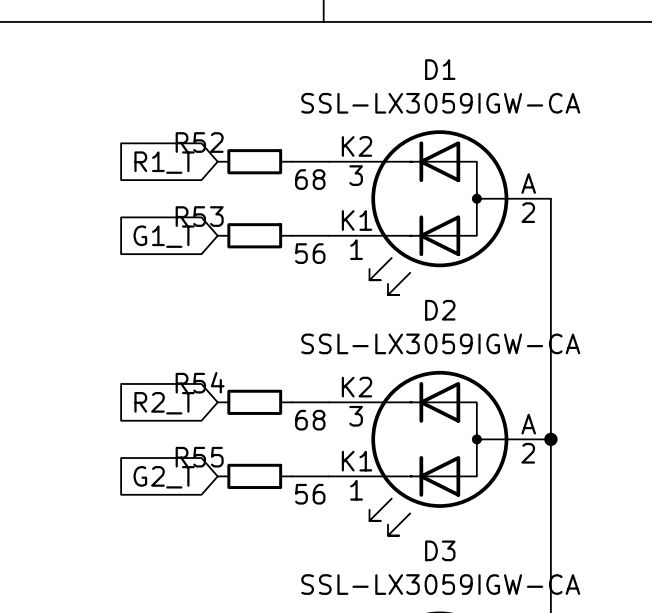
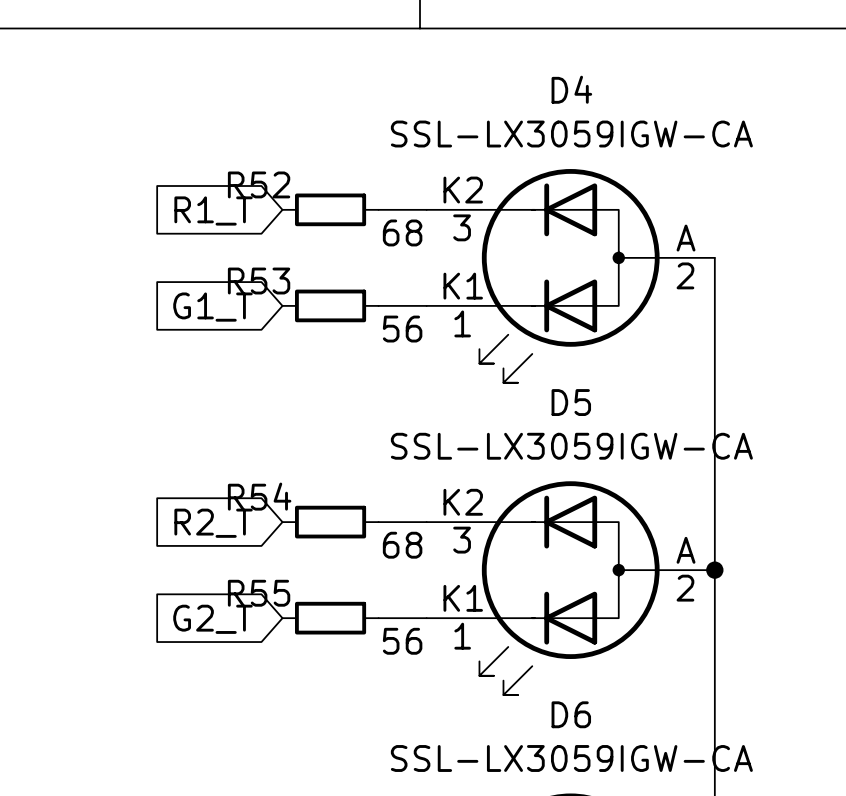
D1 name: D1 (440, 69) -> D4 (571, 89)
D2 name: D2 (440, 310) -> D5 (571, 402)
D3 name: D3 (440, 550) -> D6 (571, 714)

